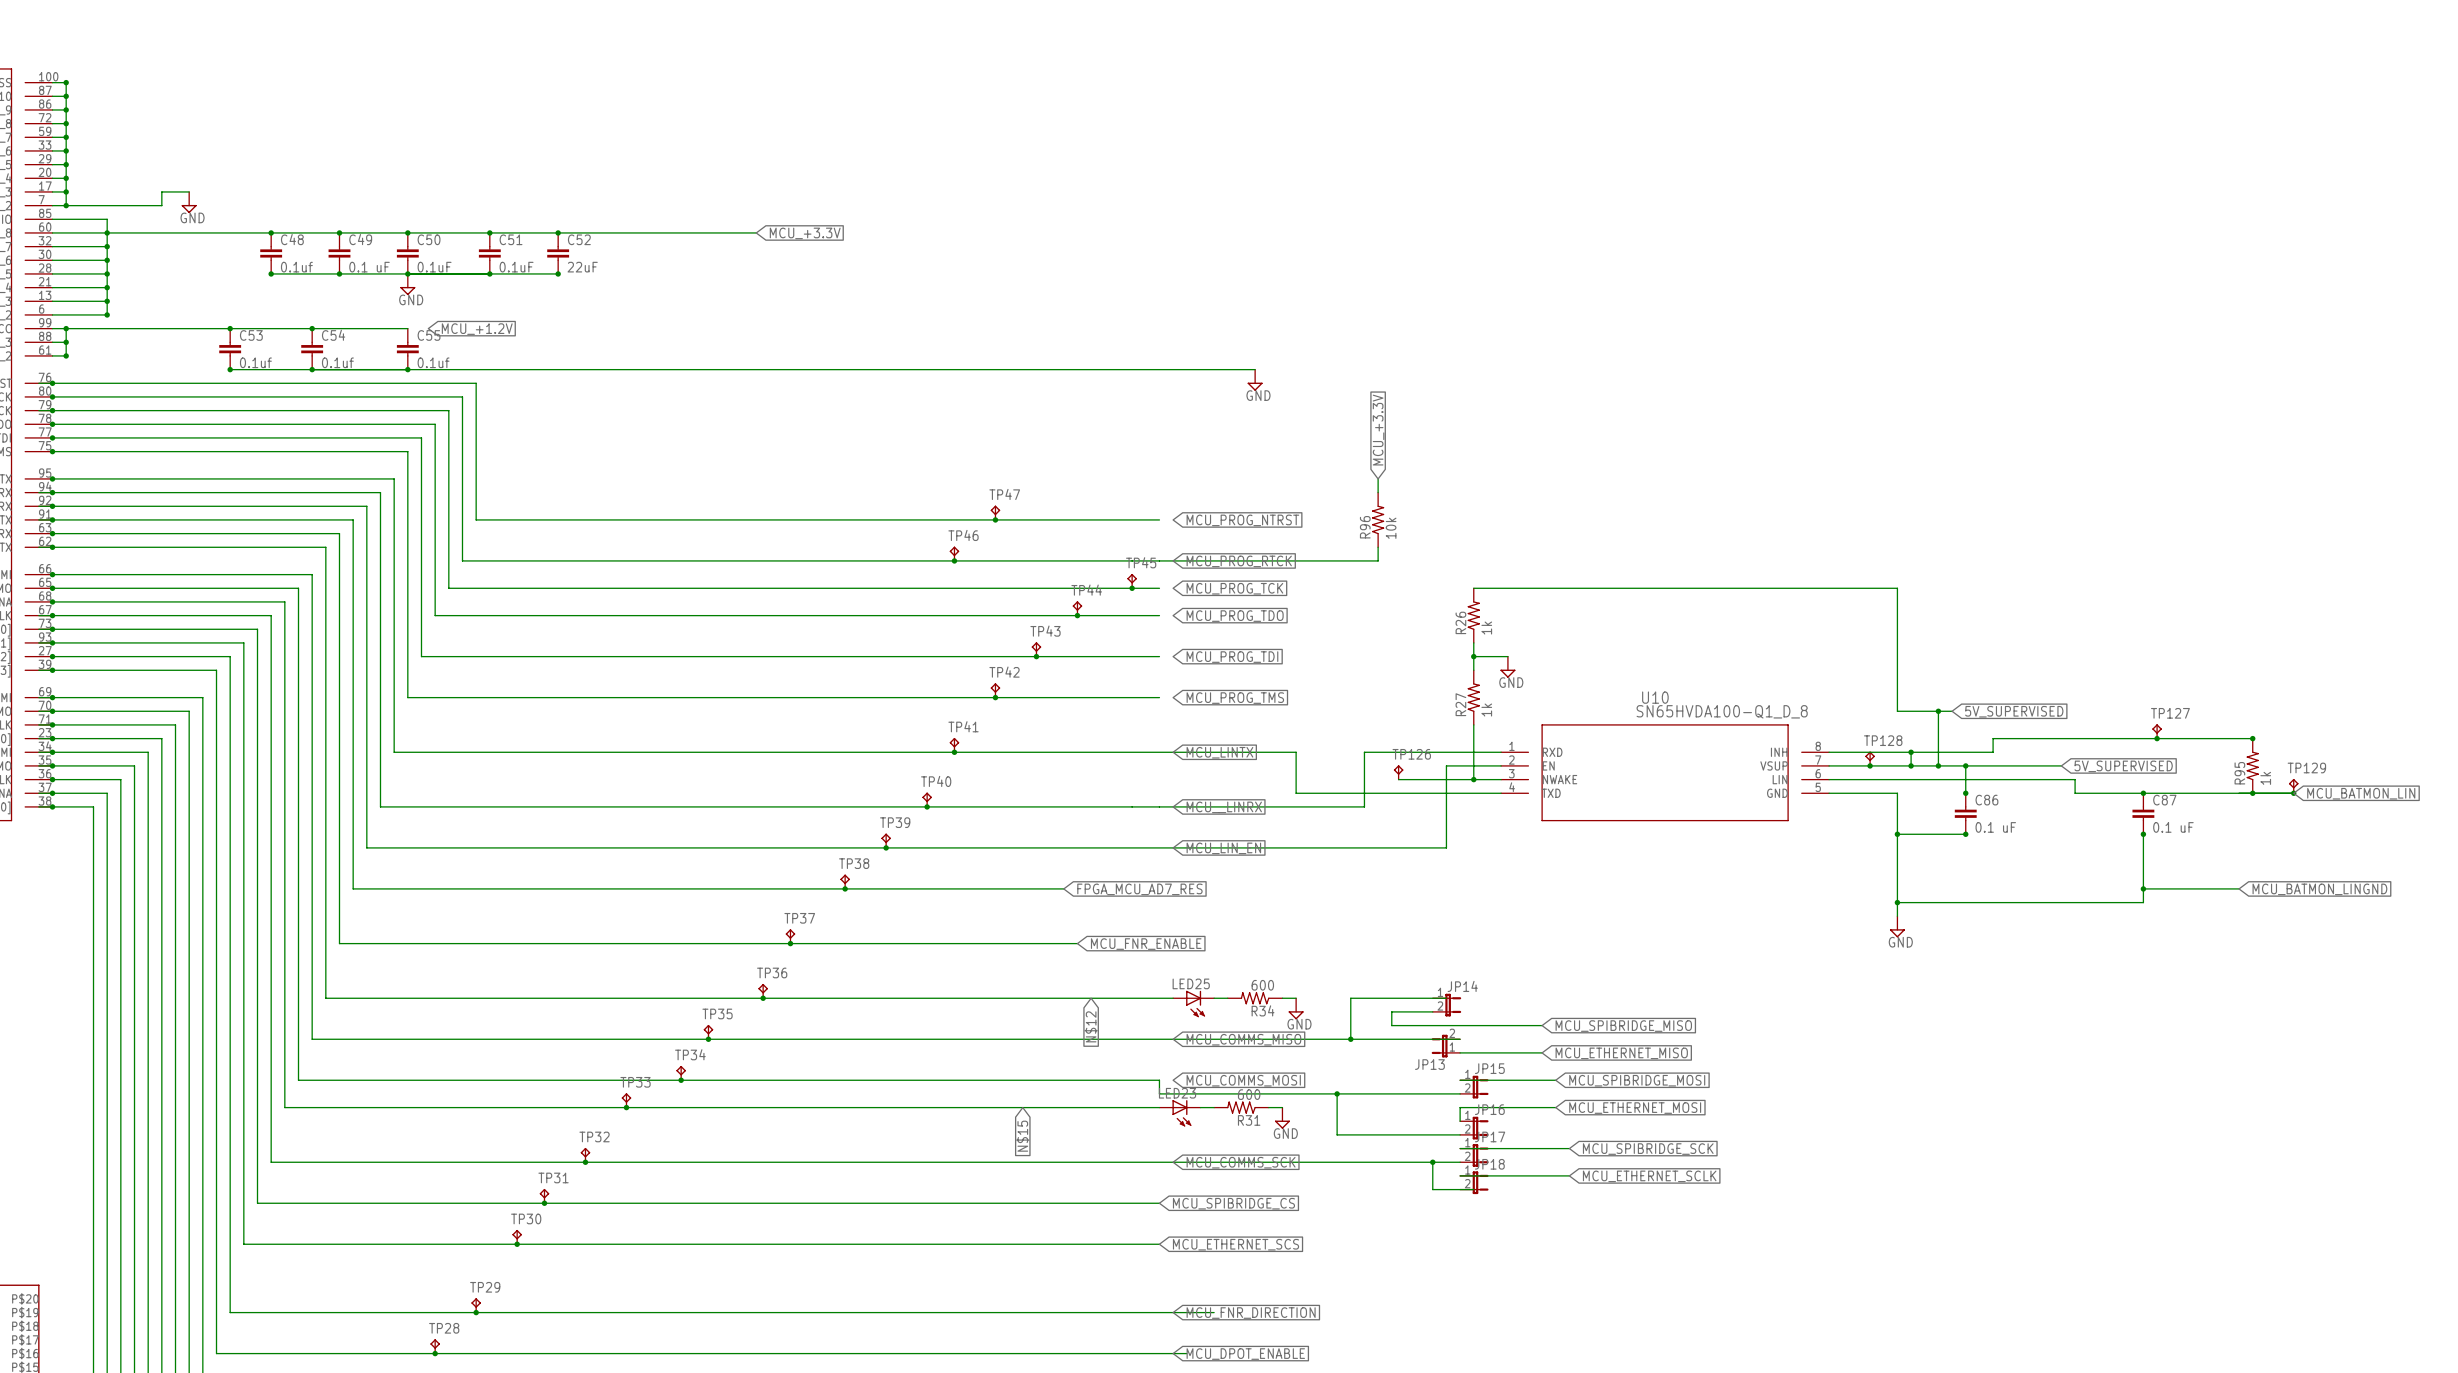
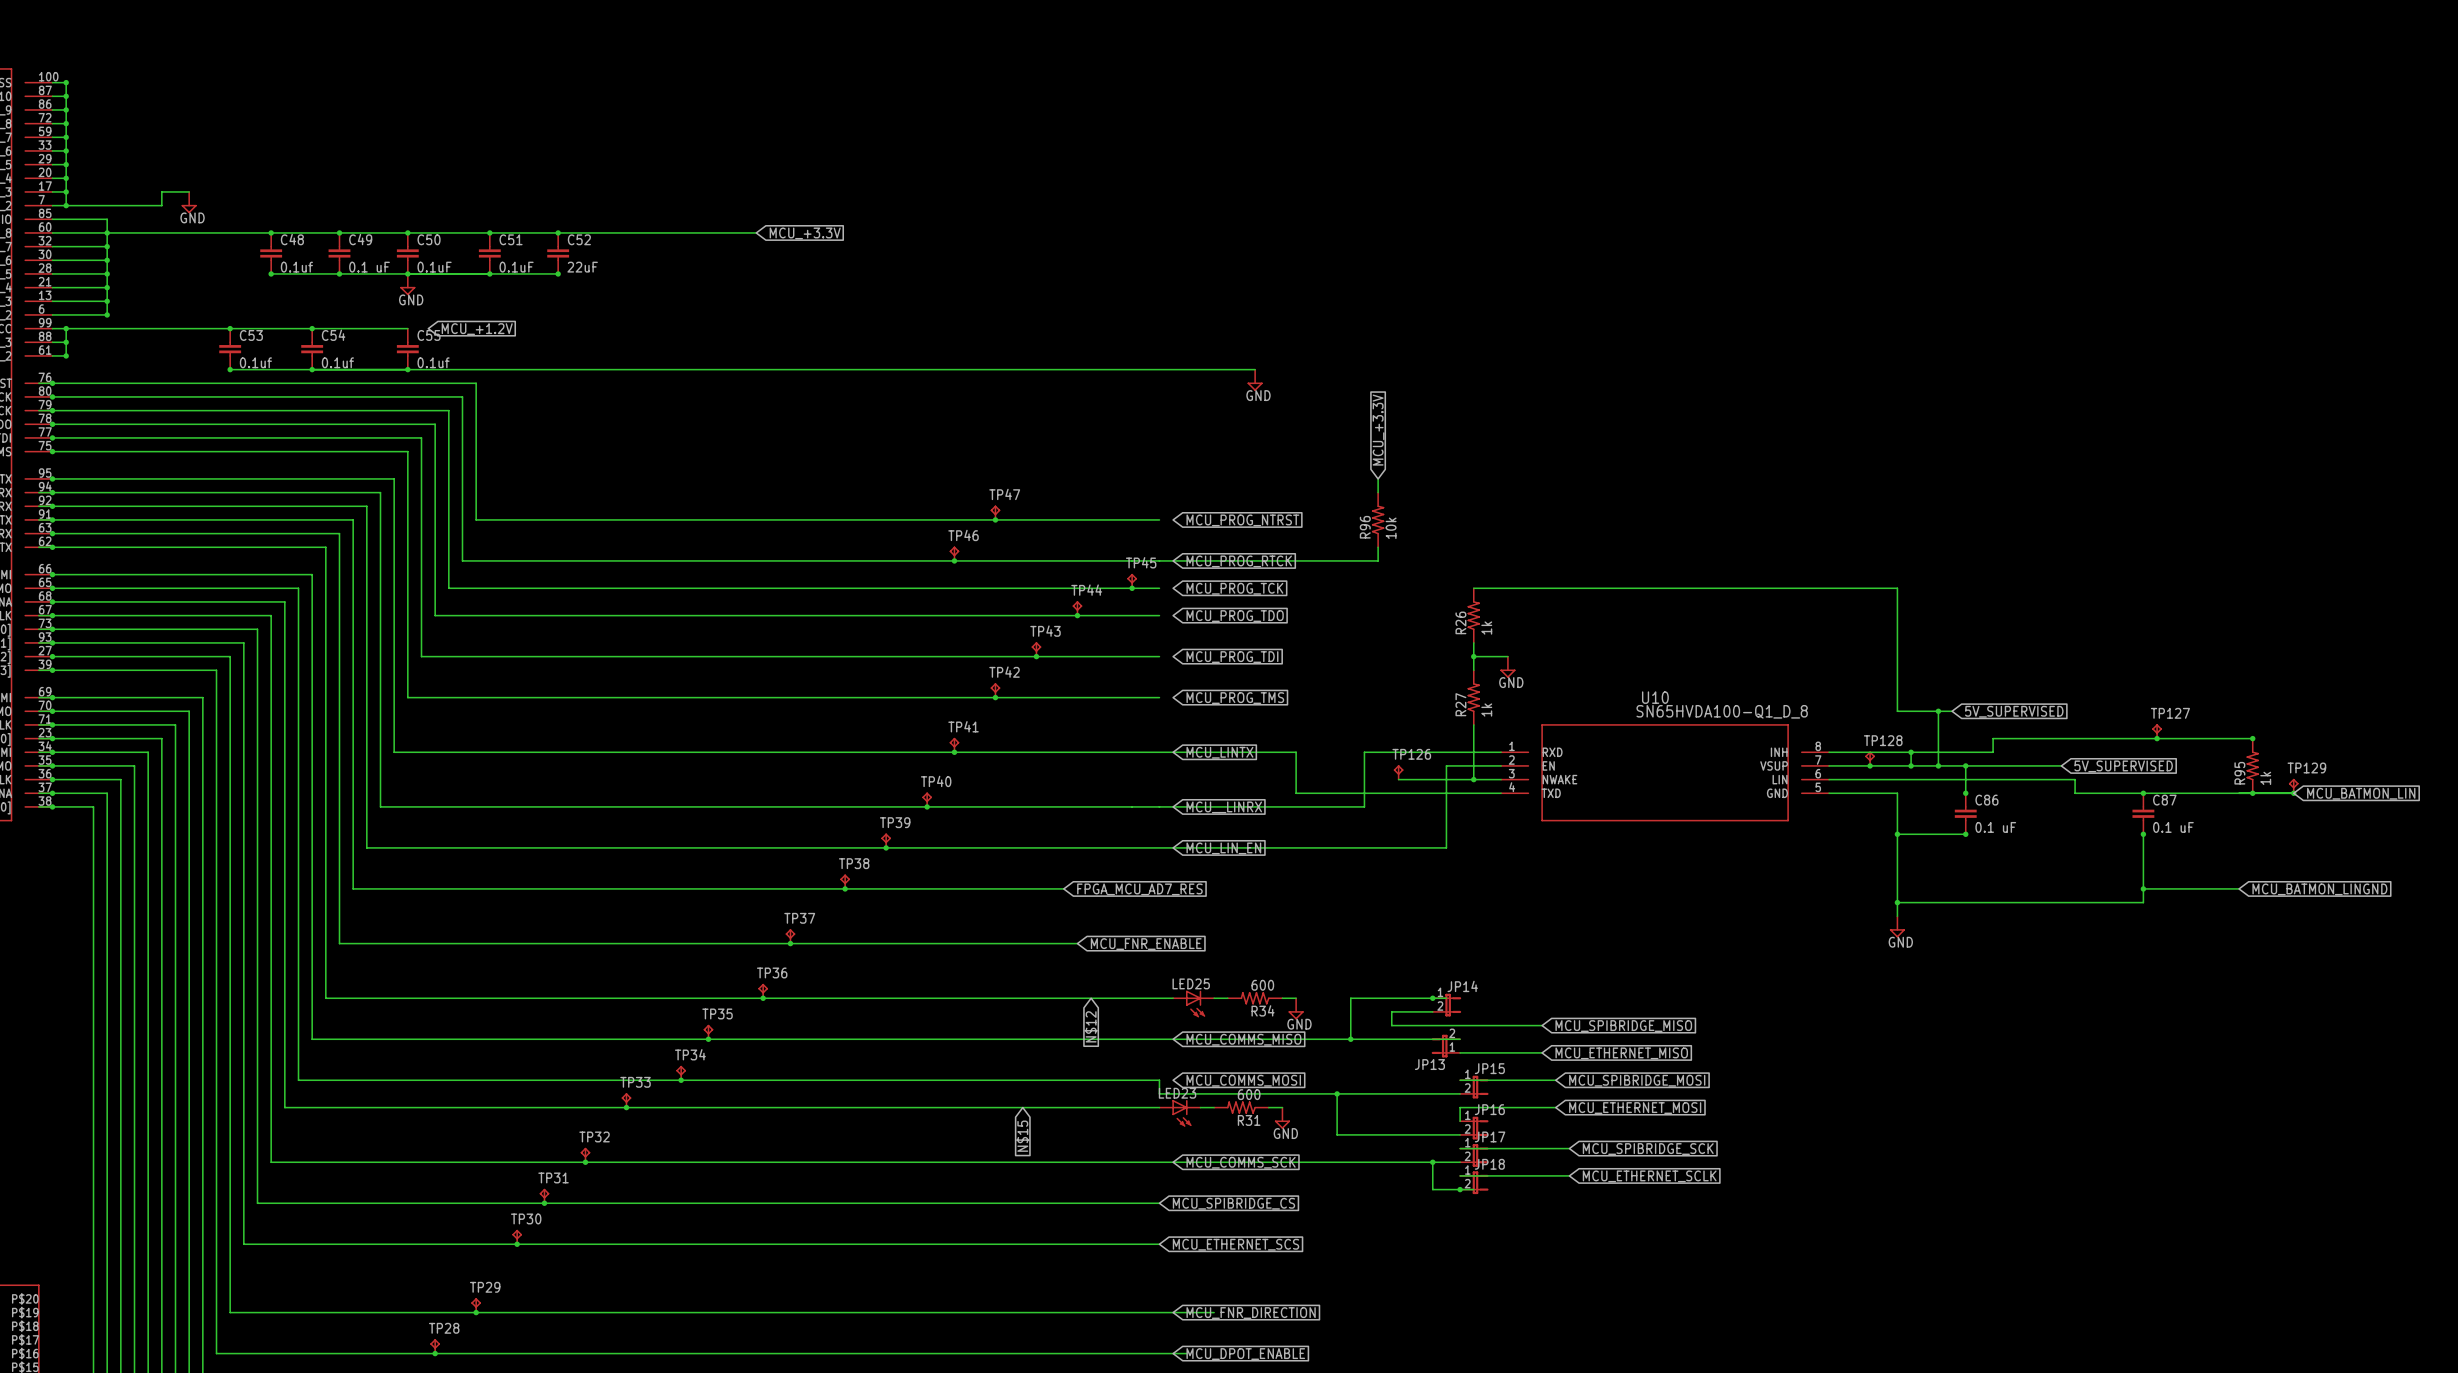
junction: none -> (1432, 998)
junction: none -> (1460, 1189)

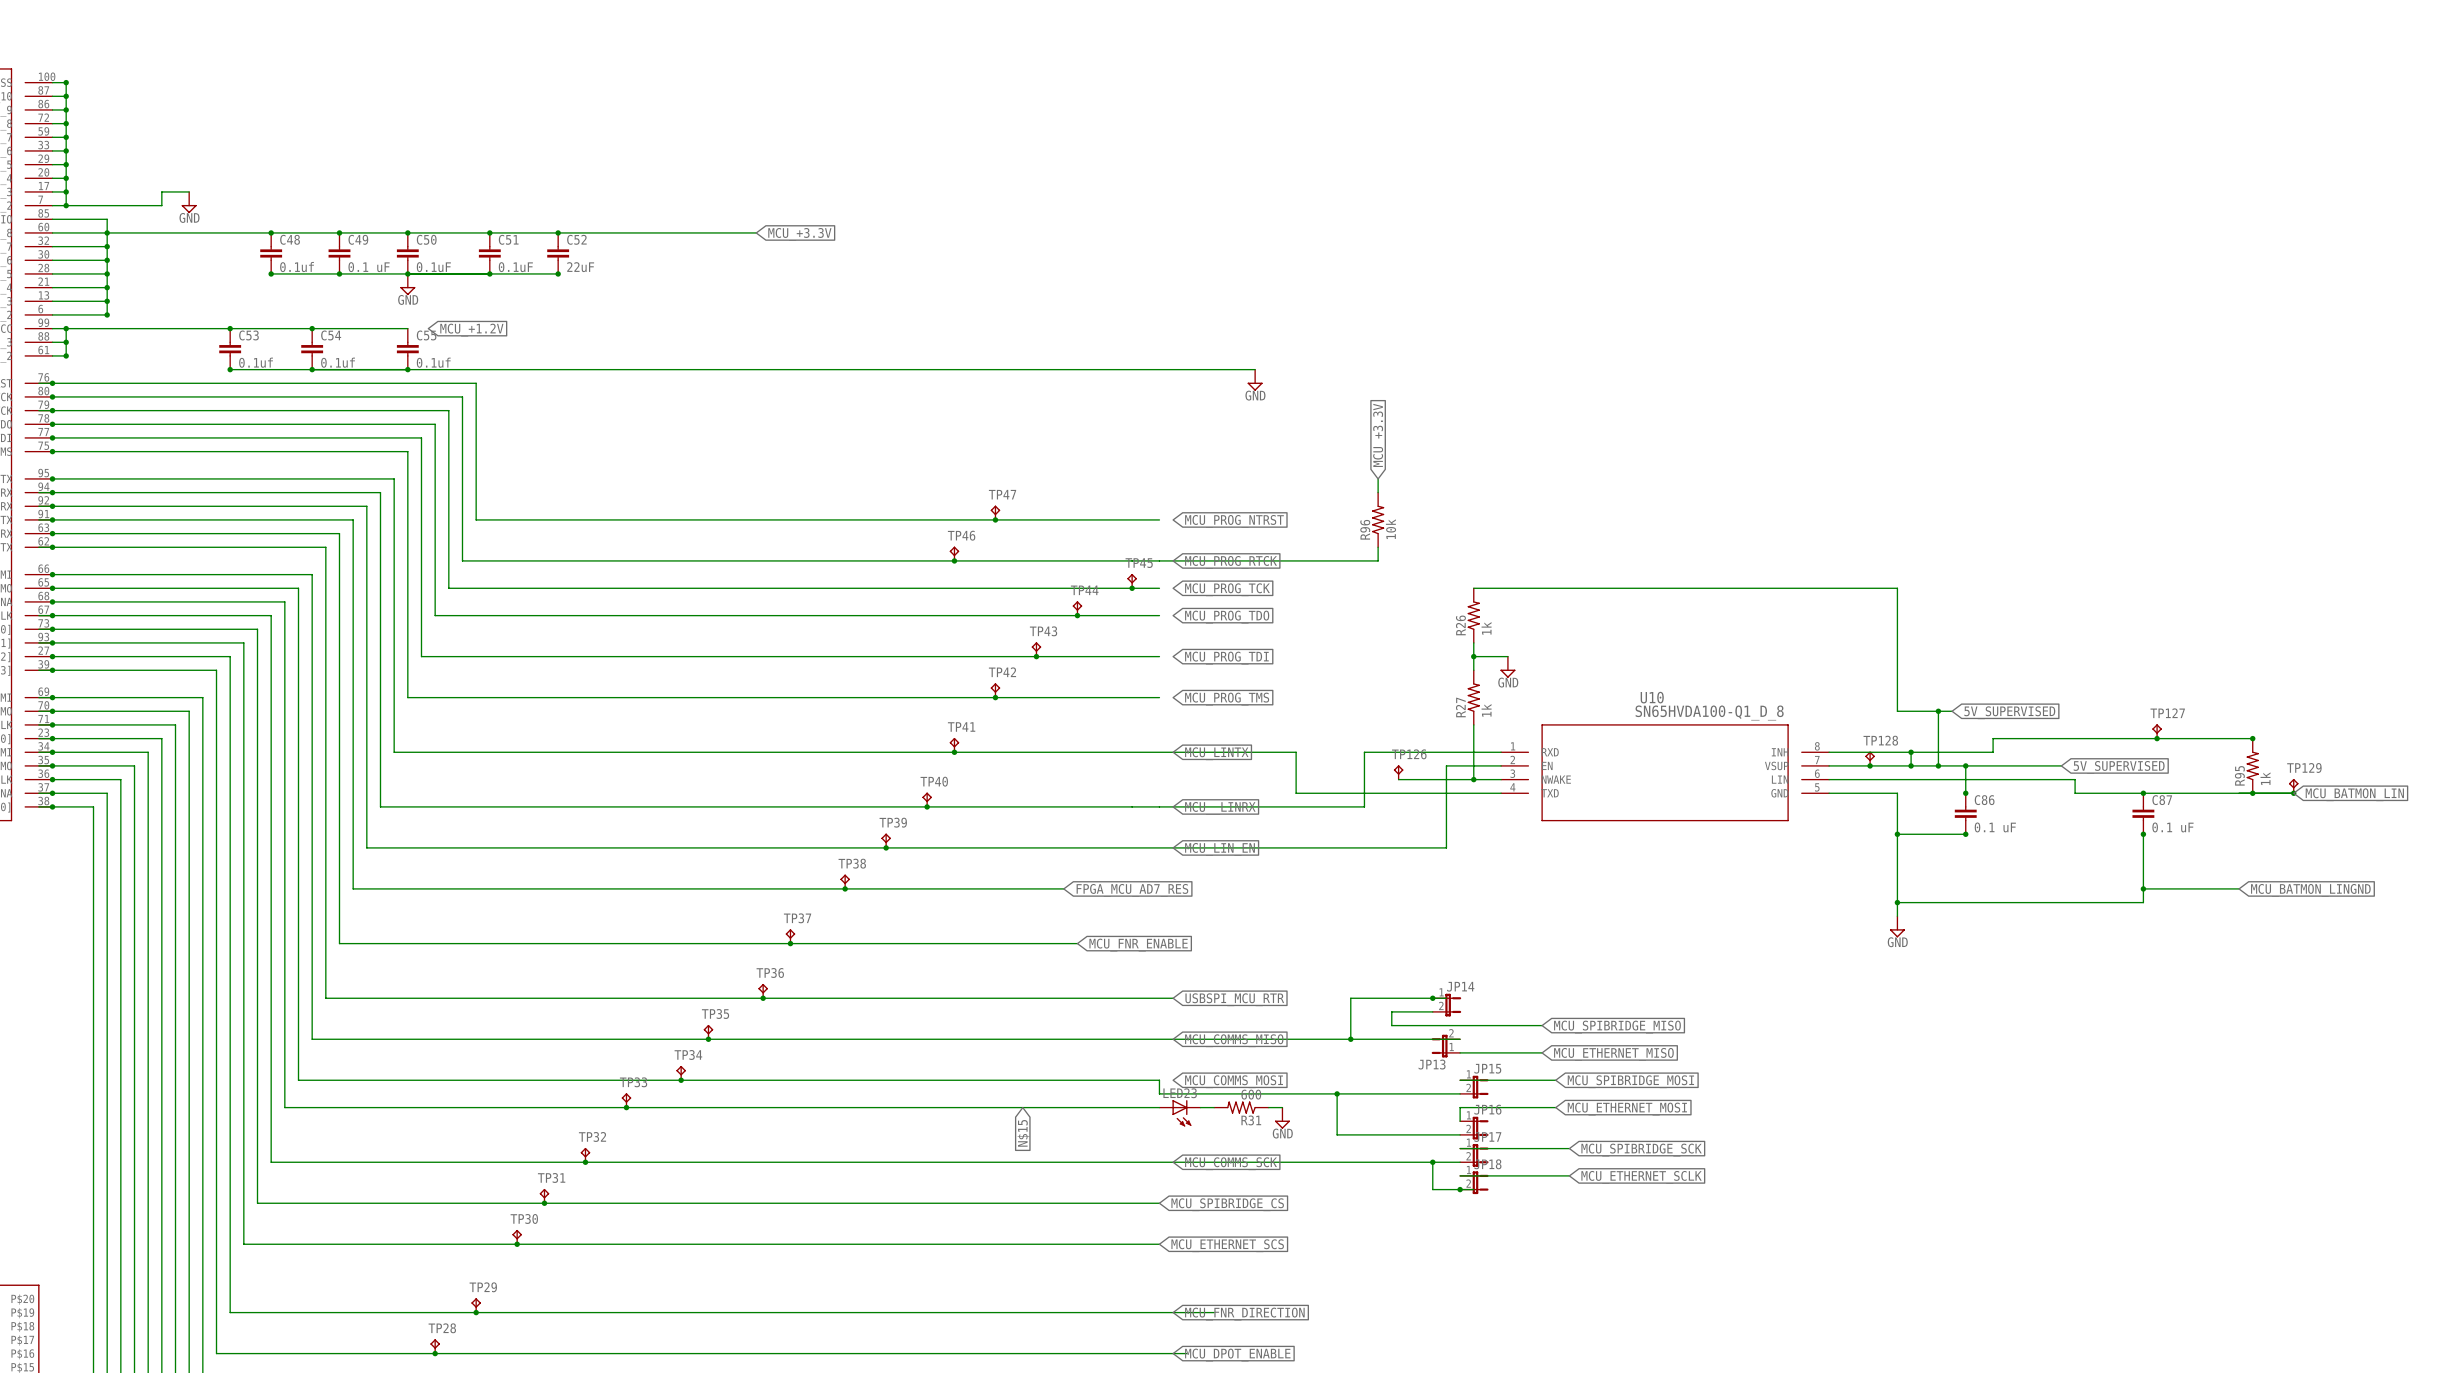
global label: none -> USBSPI_MCU_RTR (1234, 999)
R34: 600 (1255, 998) -> none
wire: (1282, 998) (1296, 998) -> none
LED25: (1193, 1003) -> none
power symbol: GND (1296, 1008) -> none
global label: N$12 (1091, 1026) -> none

